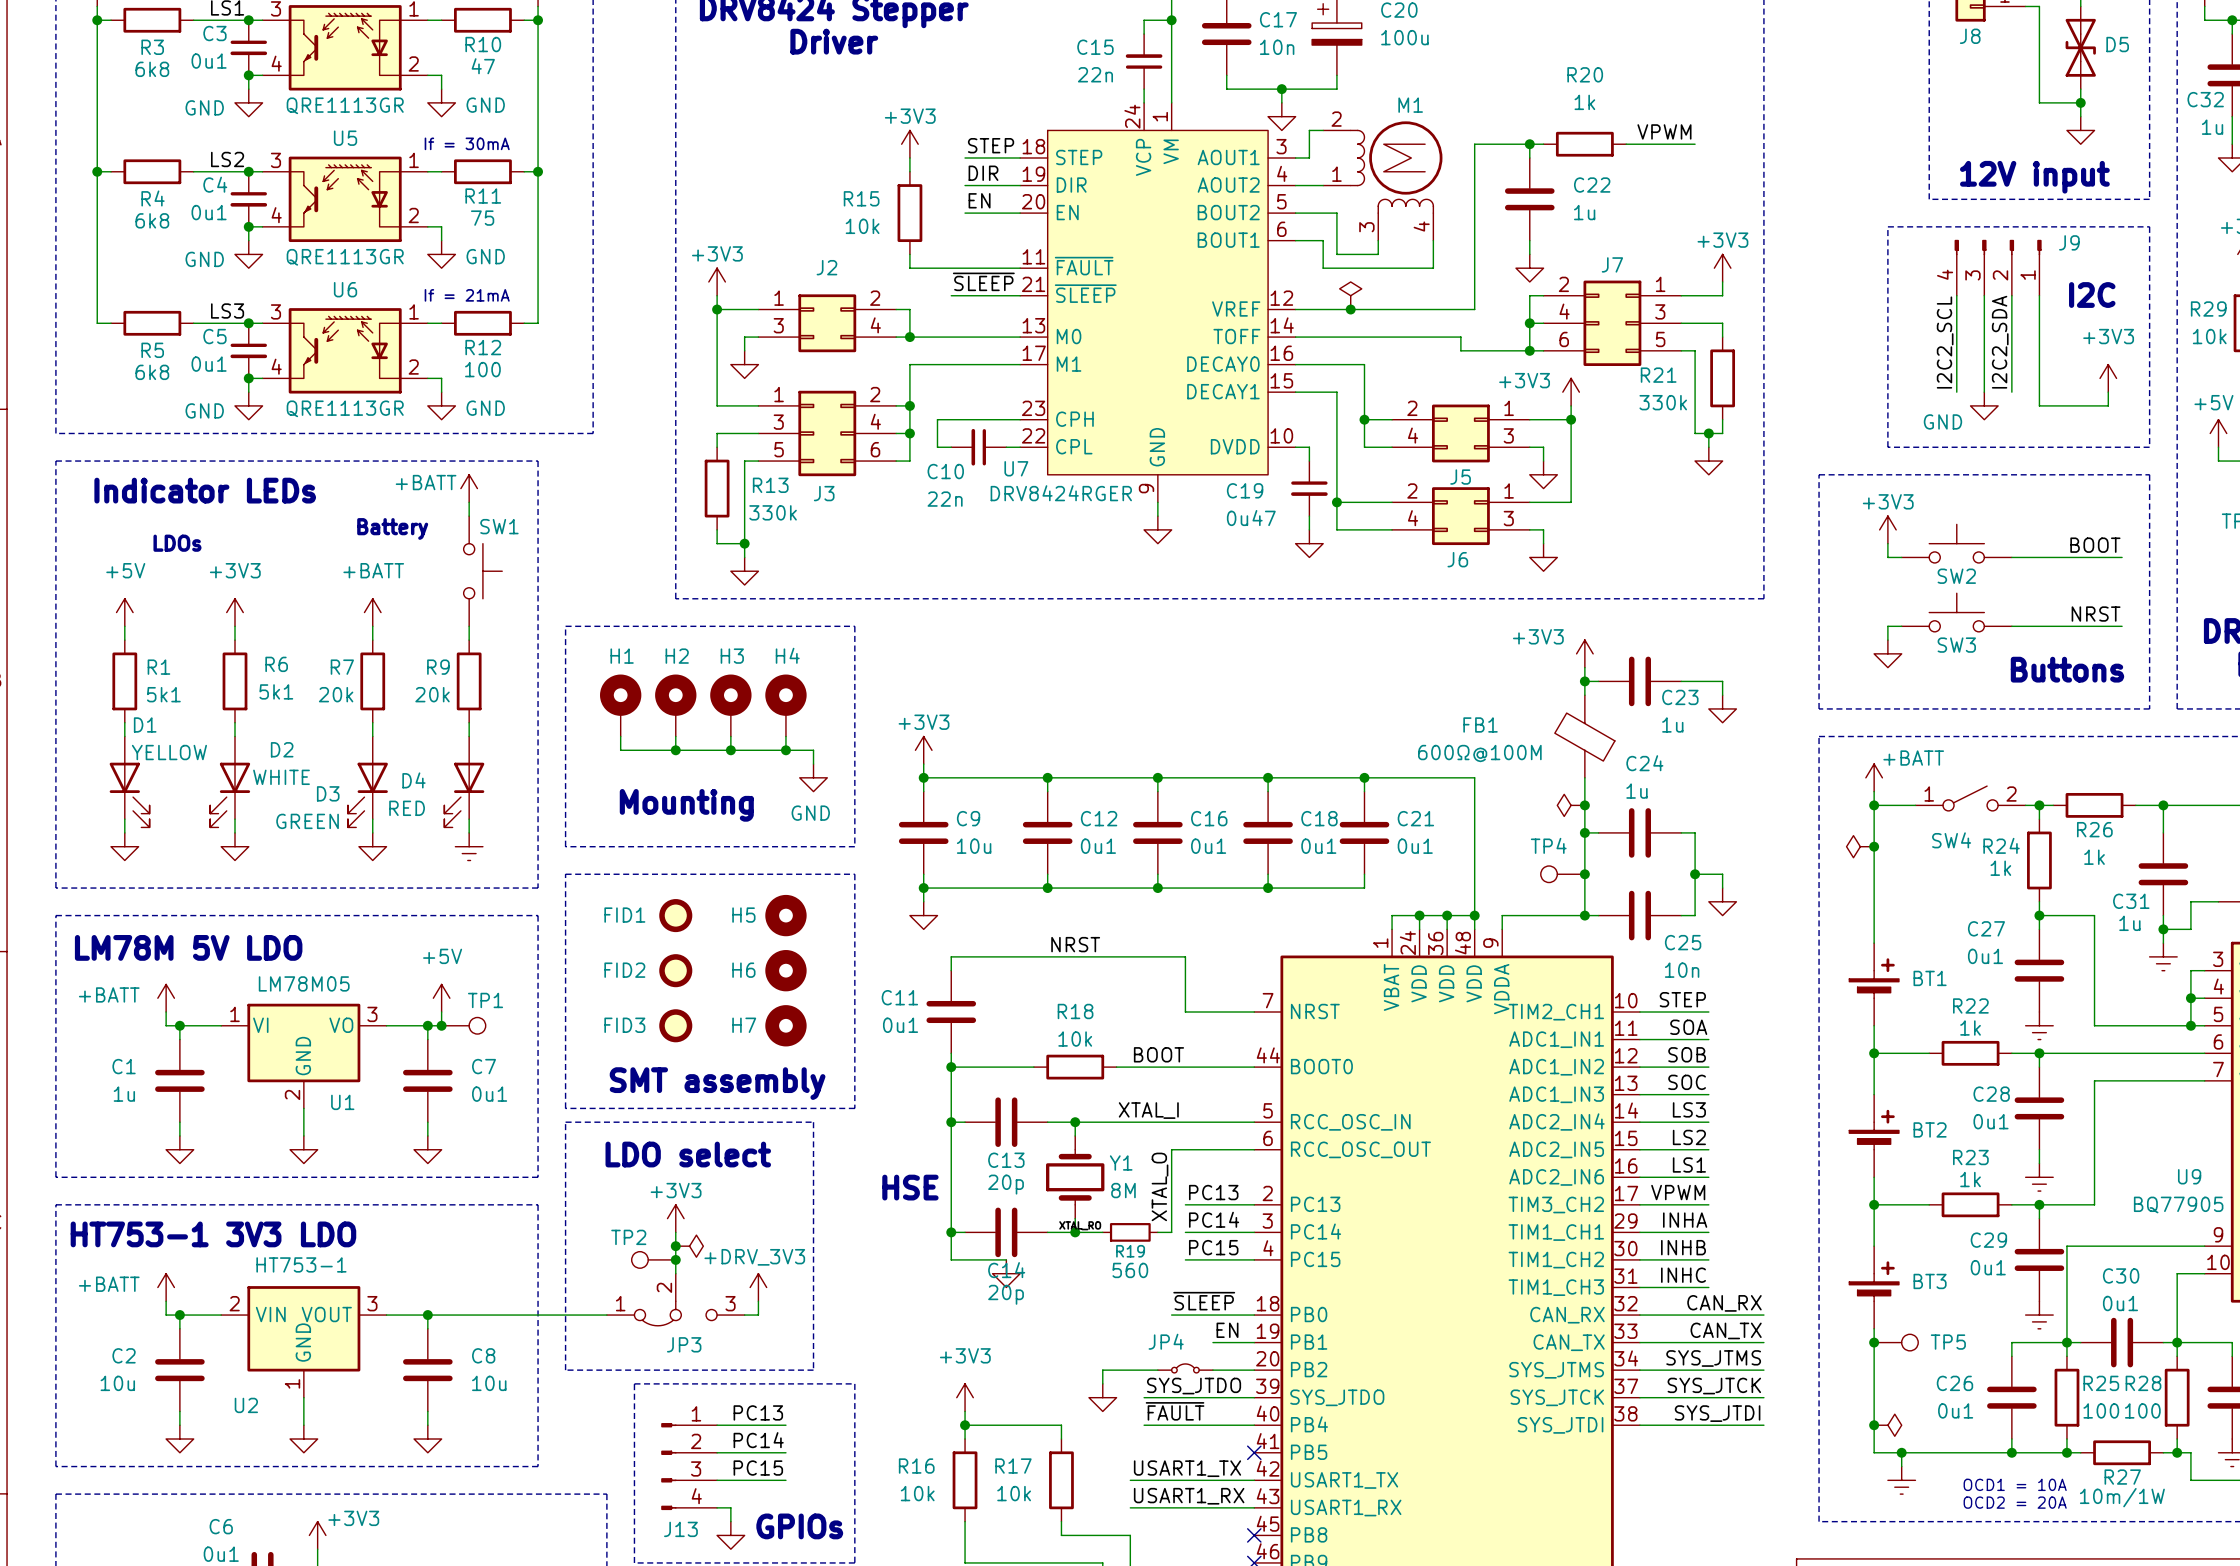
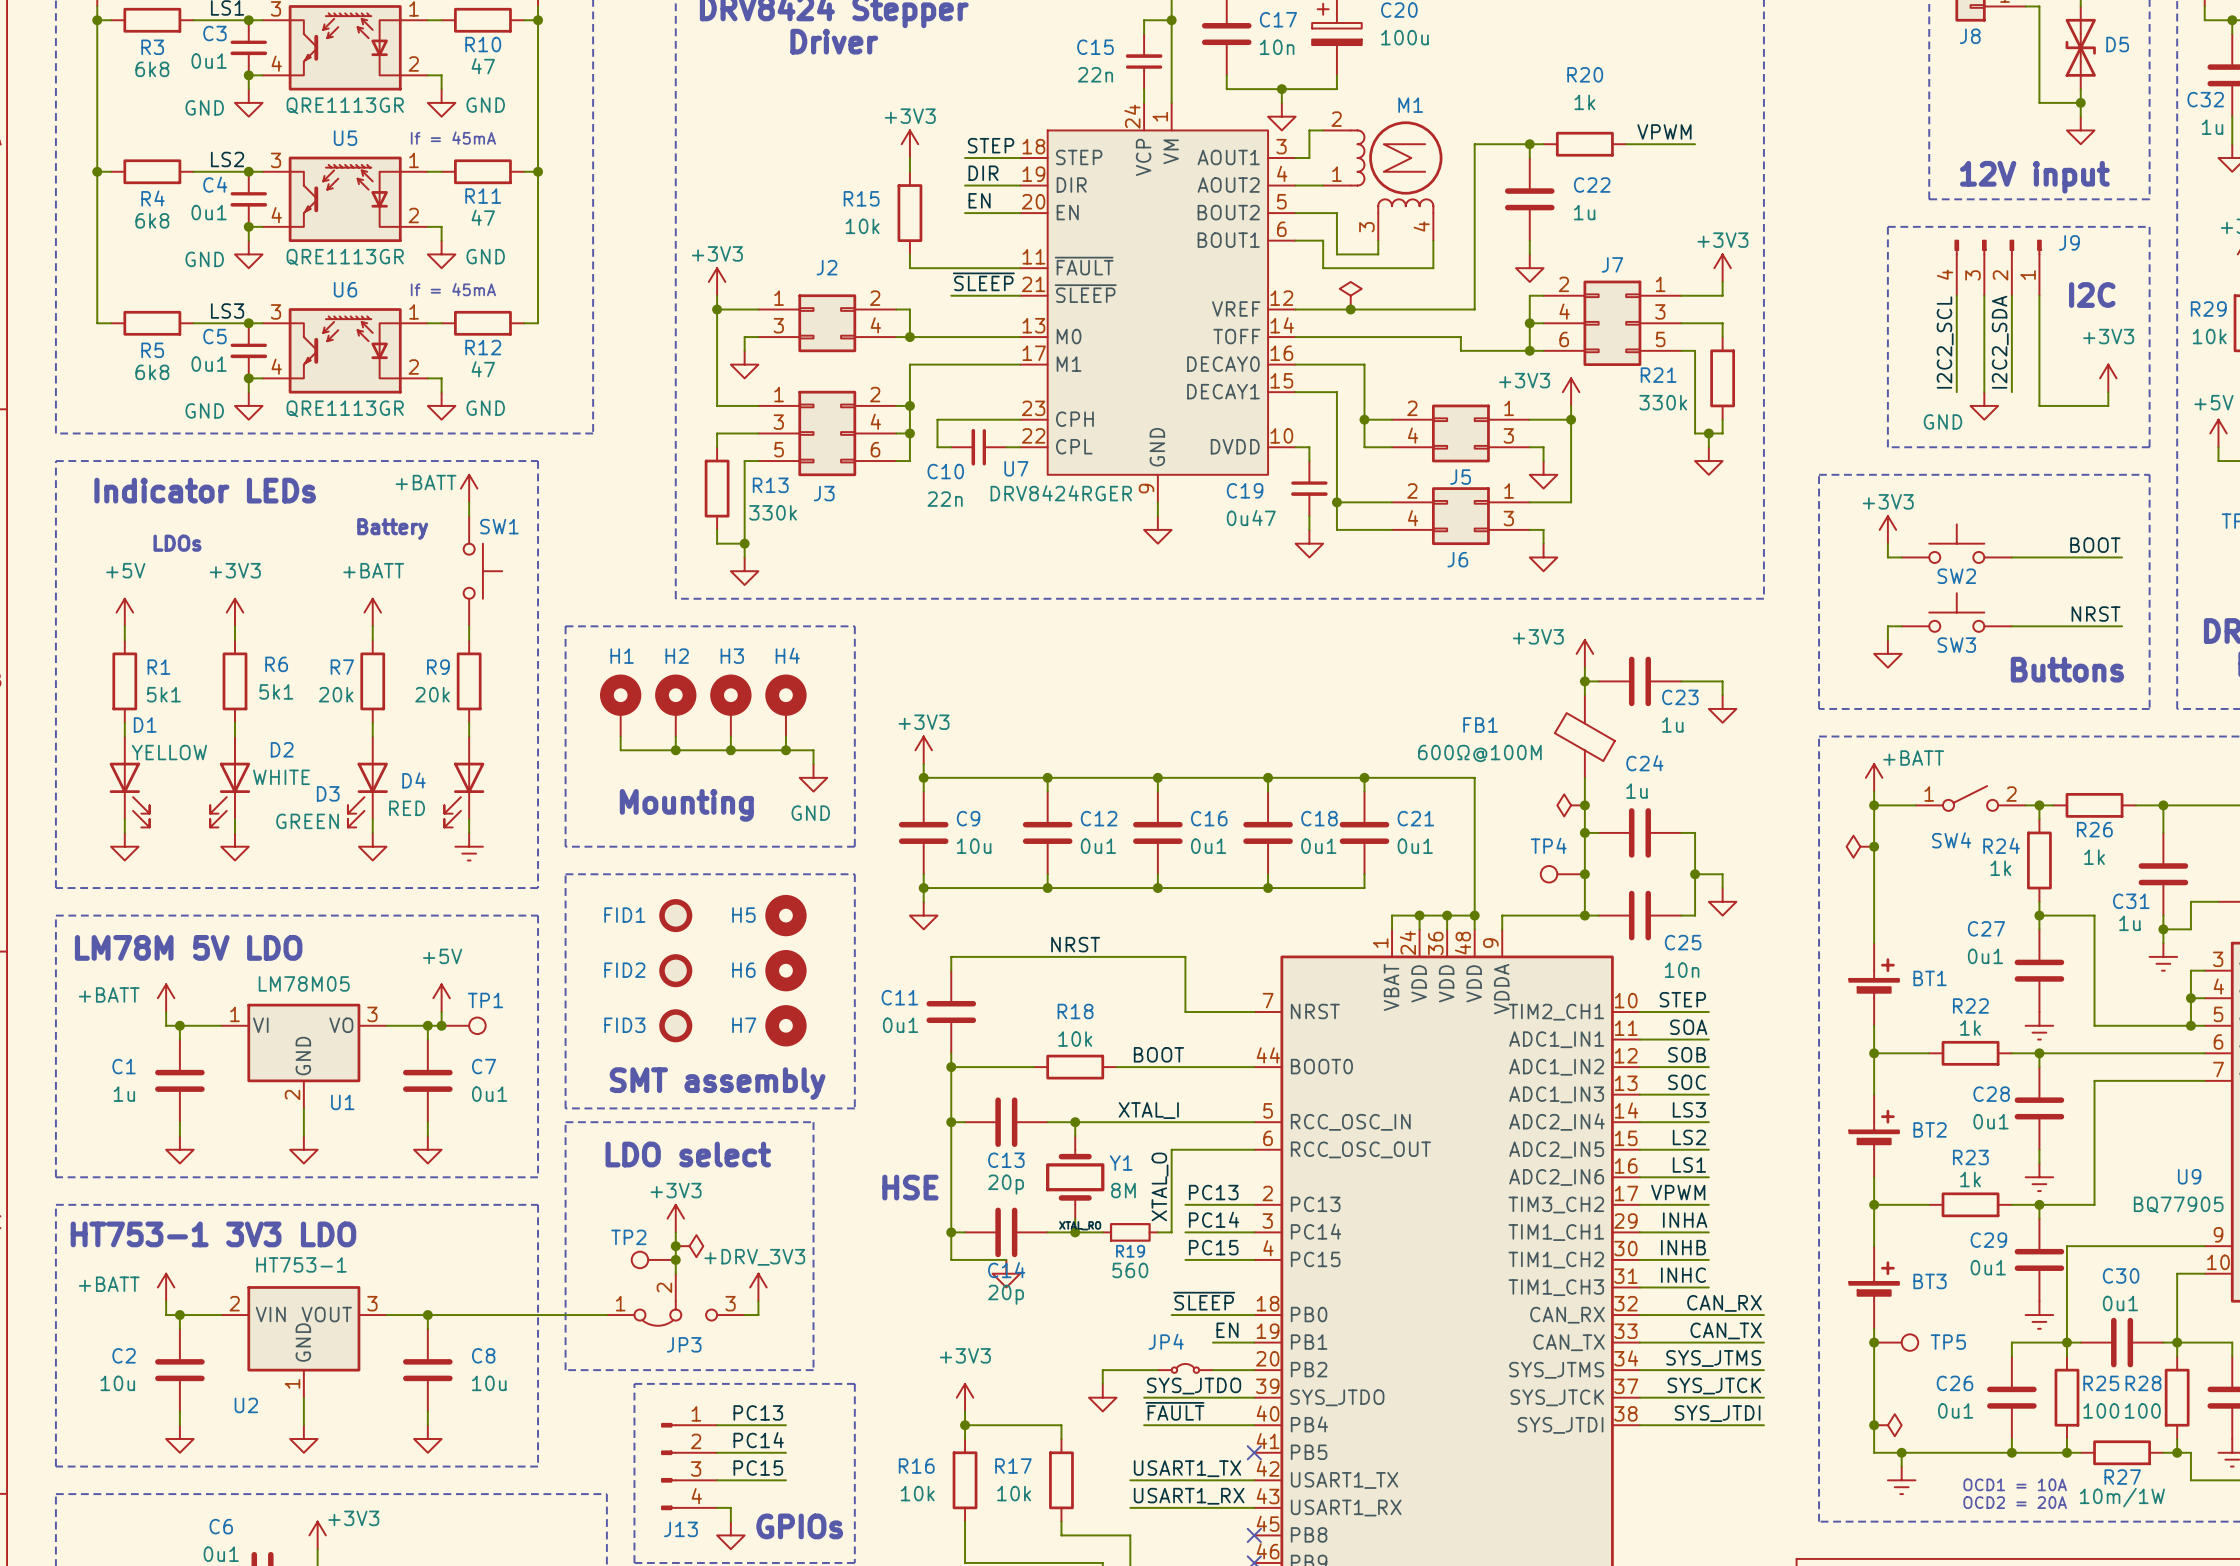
text: If = 30mA (467, 143) -> If = 45mA (453, 138)
R11 value: 75 (482, 218) -> 47 (483, 217)
text: If = 21mA (467, 295) -> If = 45mA (453, 289)
R12 value: 100 (482, 369) -> 47 (483, 369)

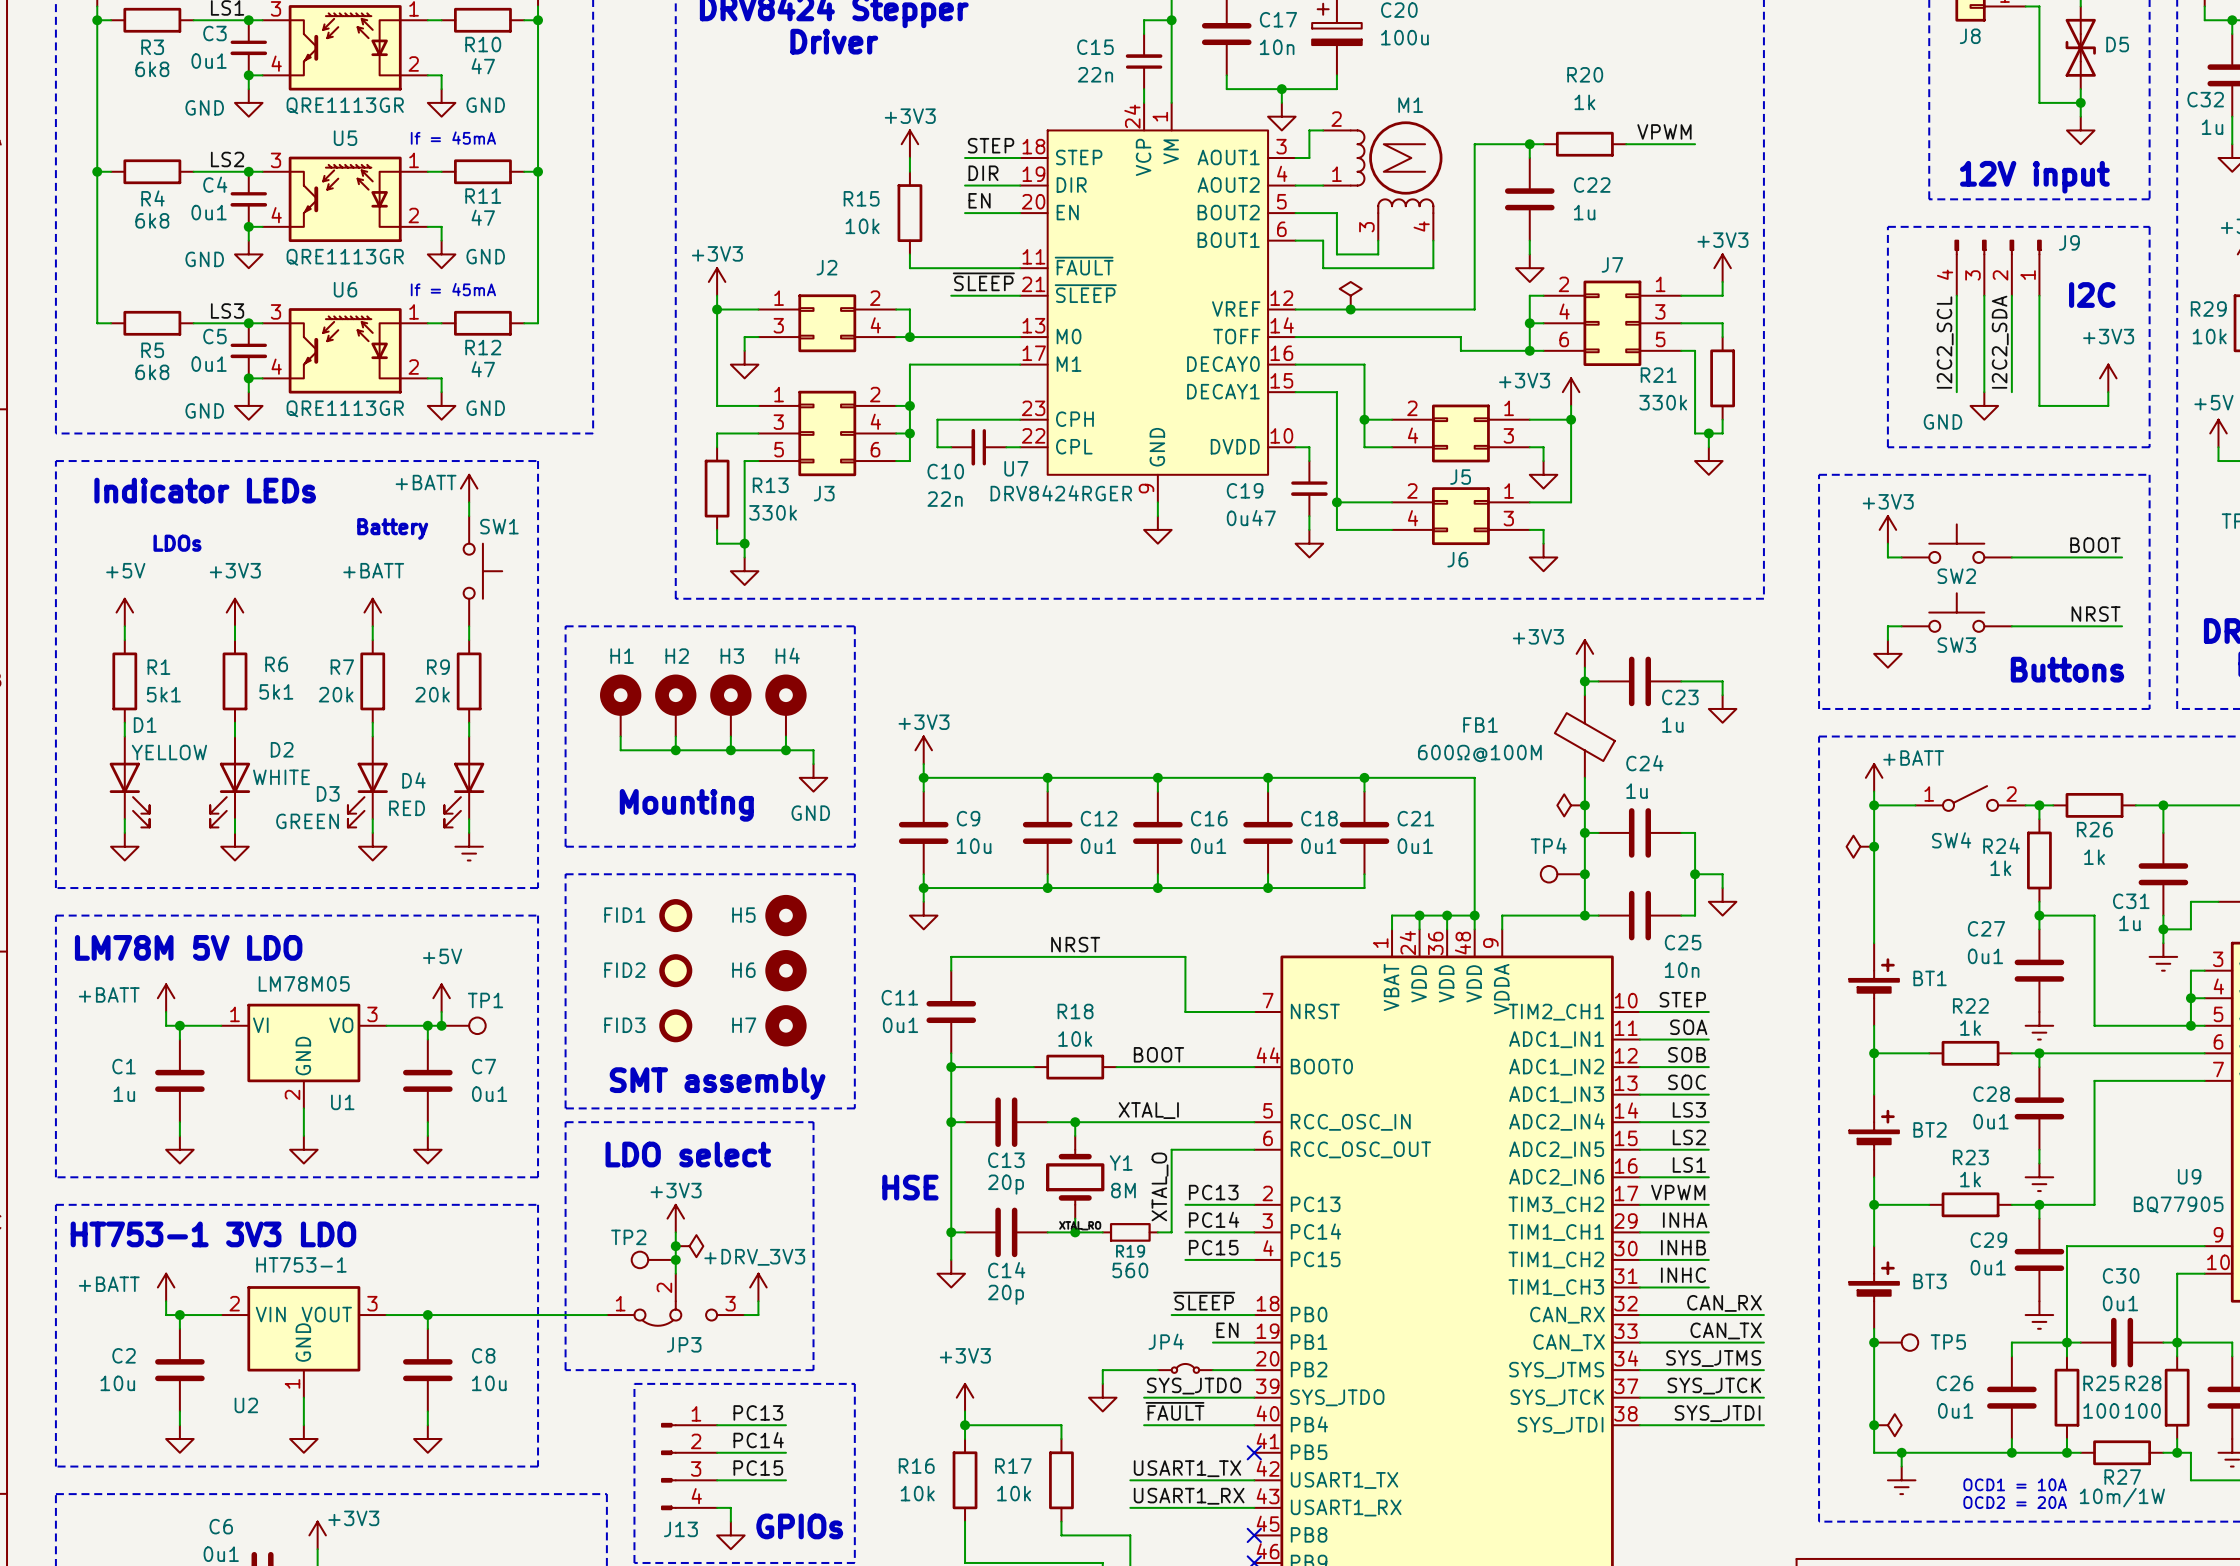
wire: (951, 1259) (1006, 1259) -> none
power symbol position: (1006, 1273) -> (951, 1273)

